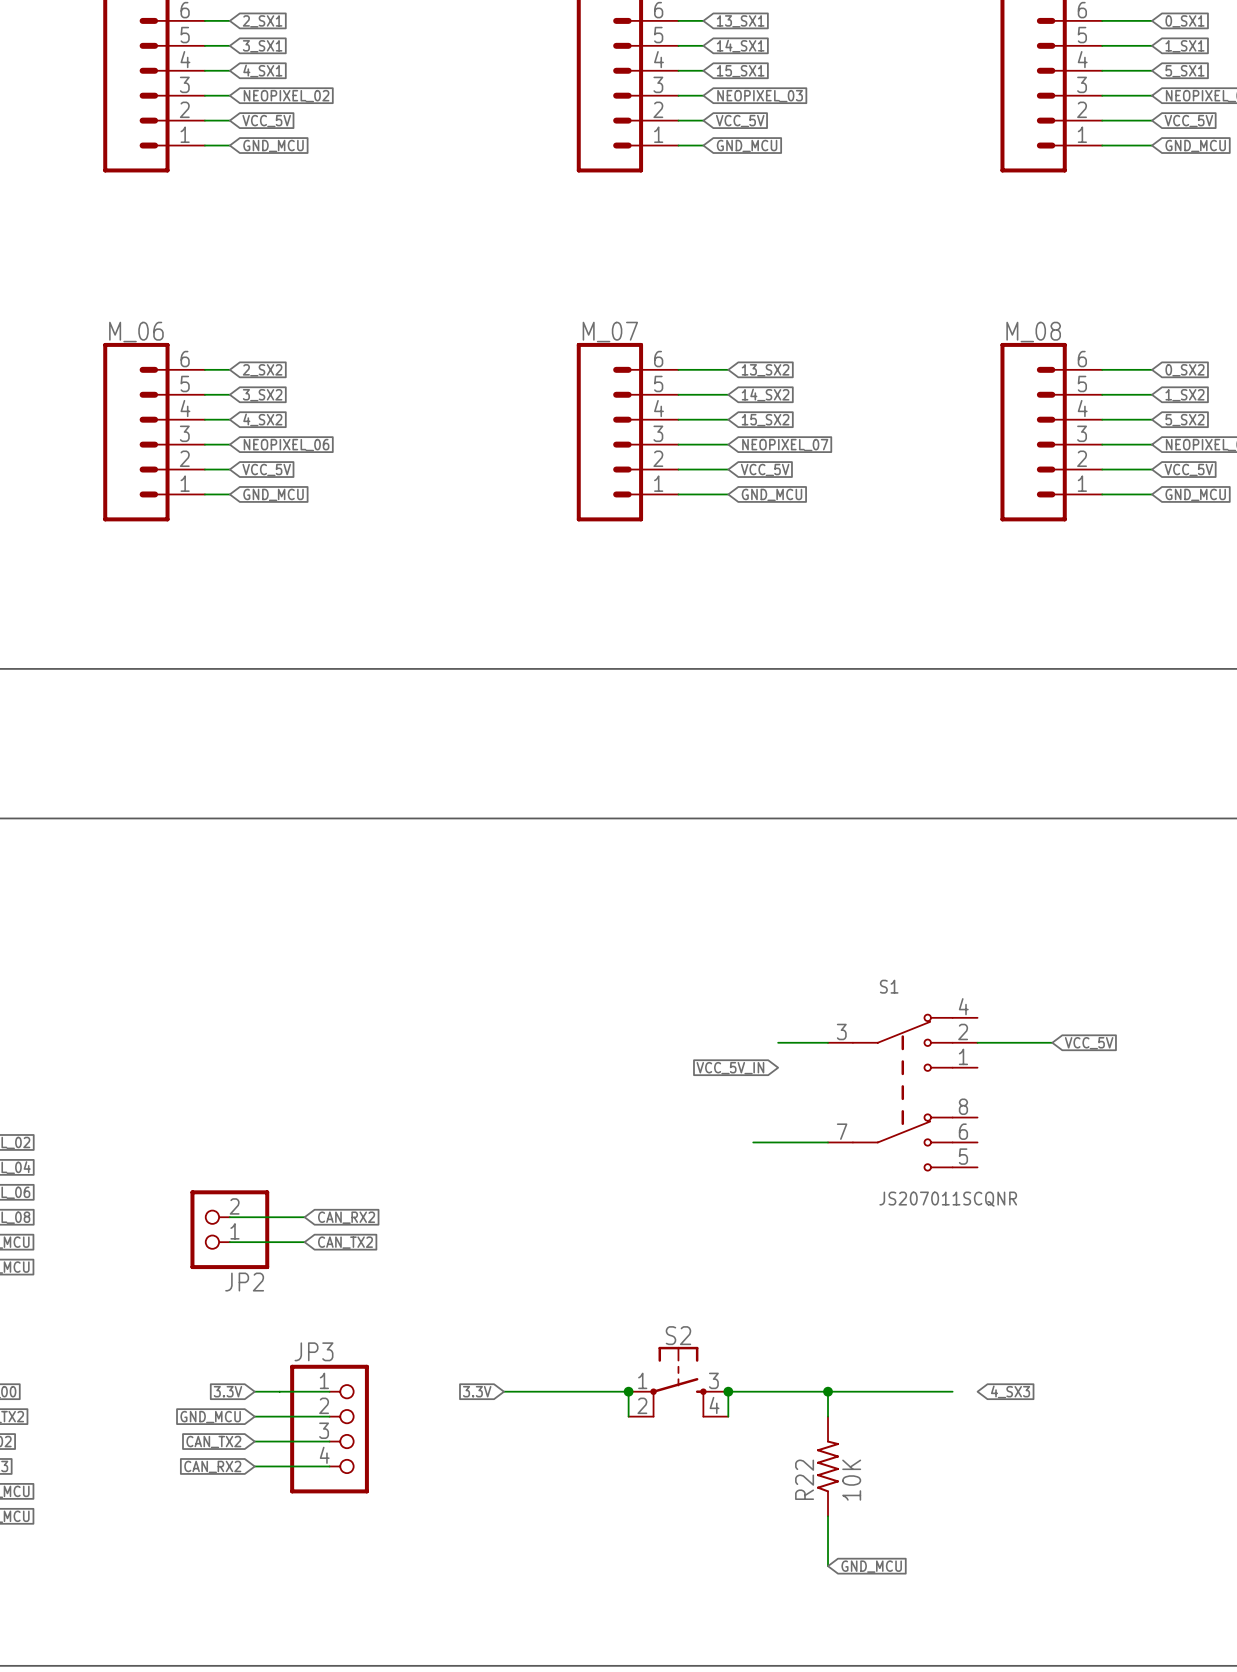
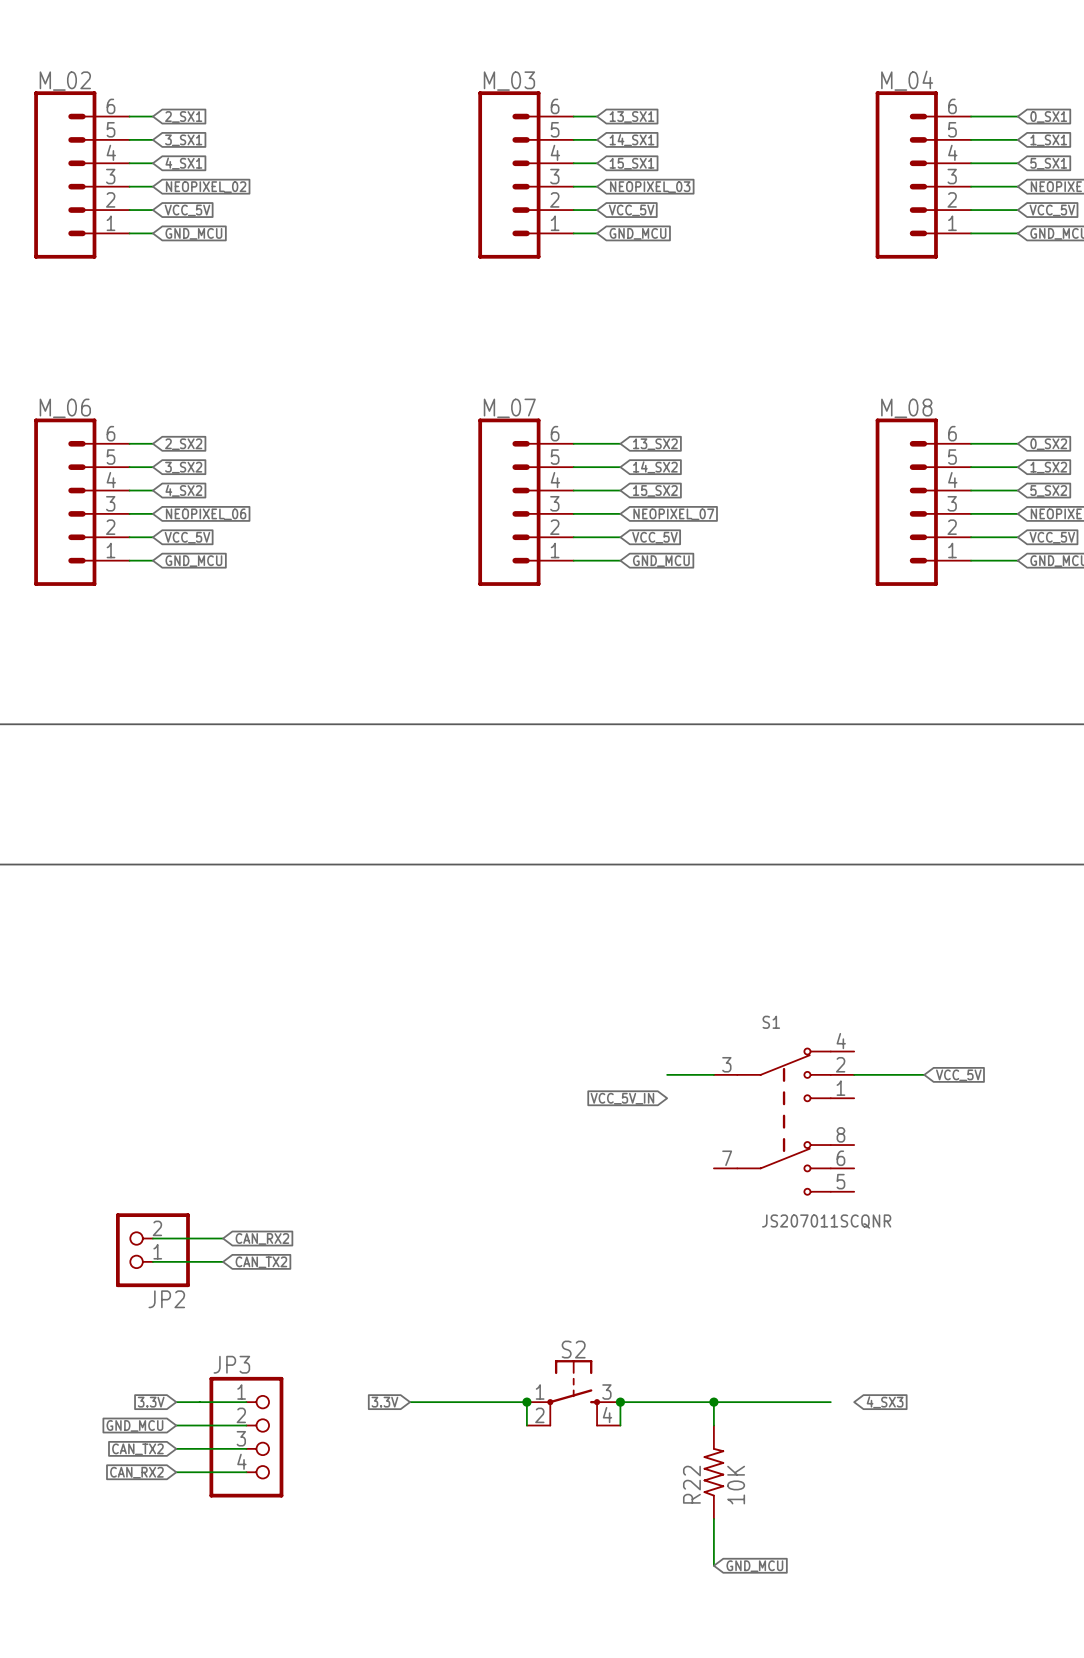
wire: (753, 1142) (828, 1142) -> none

